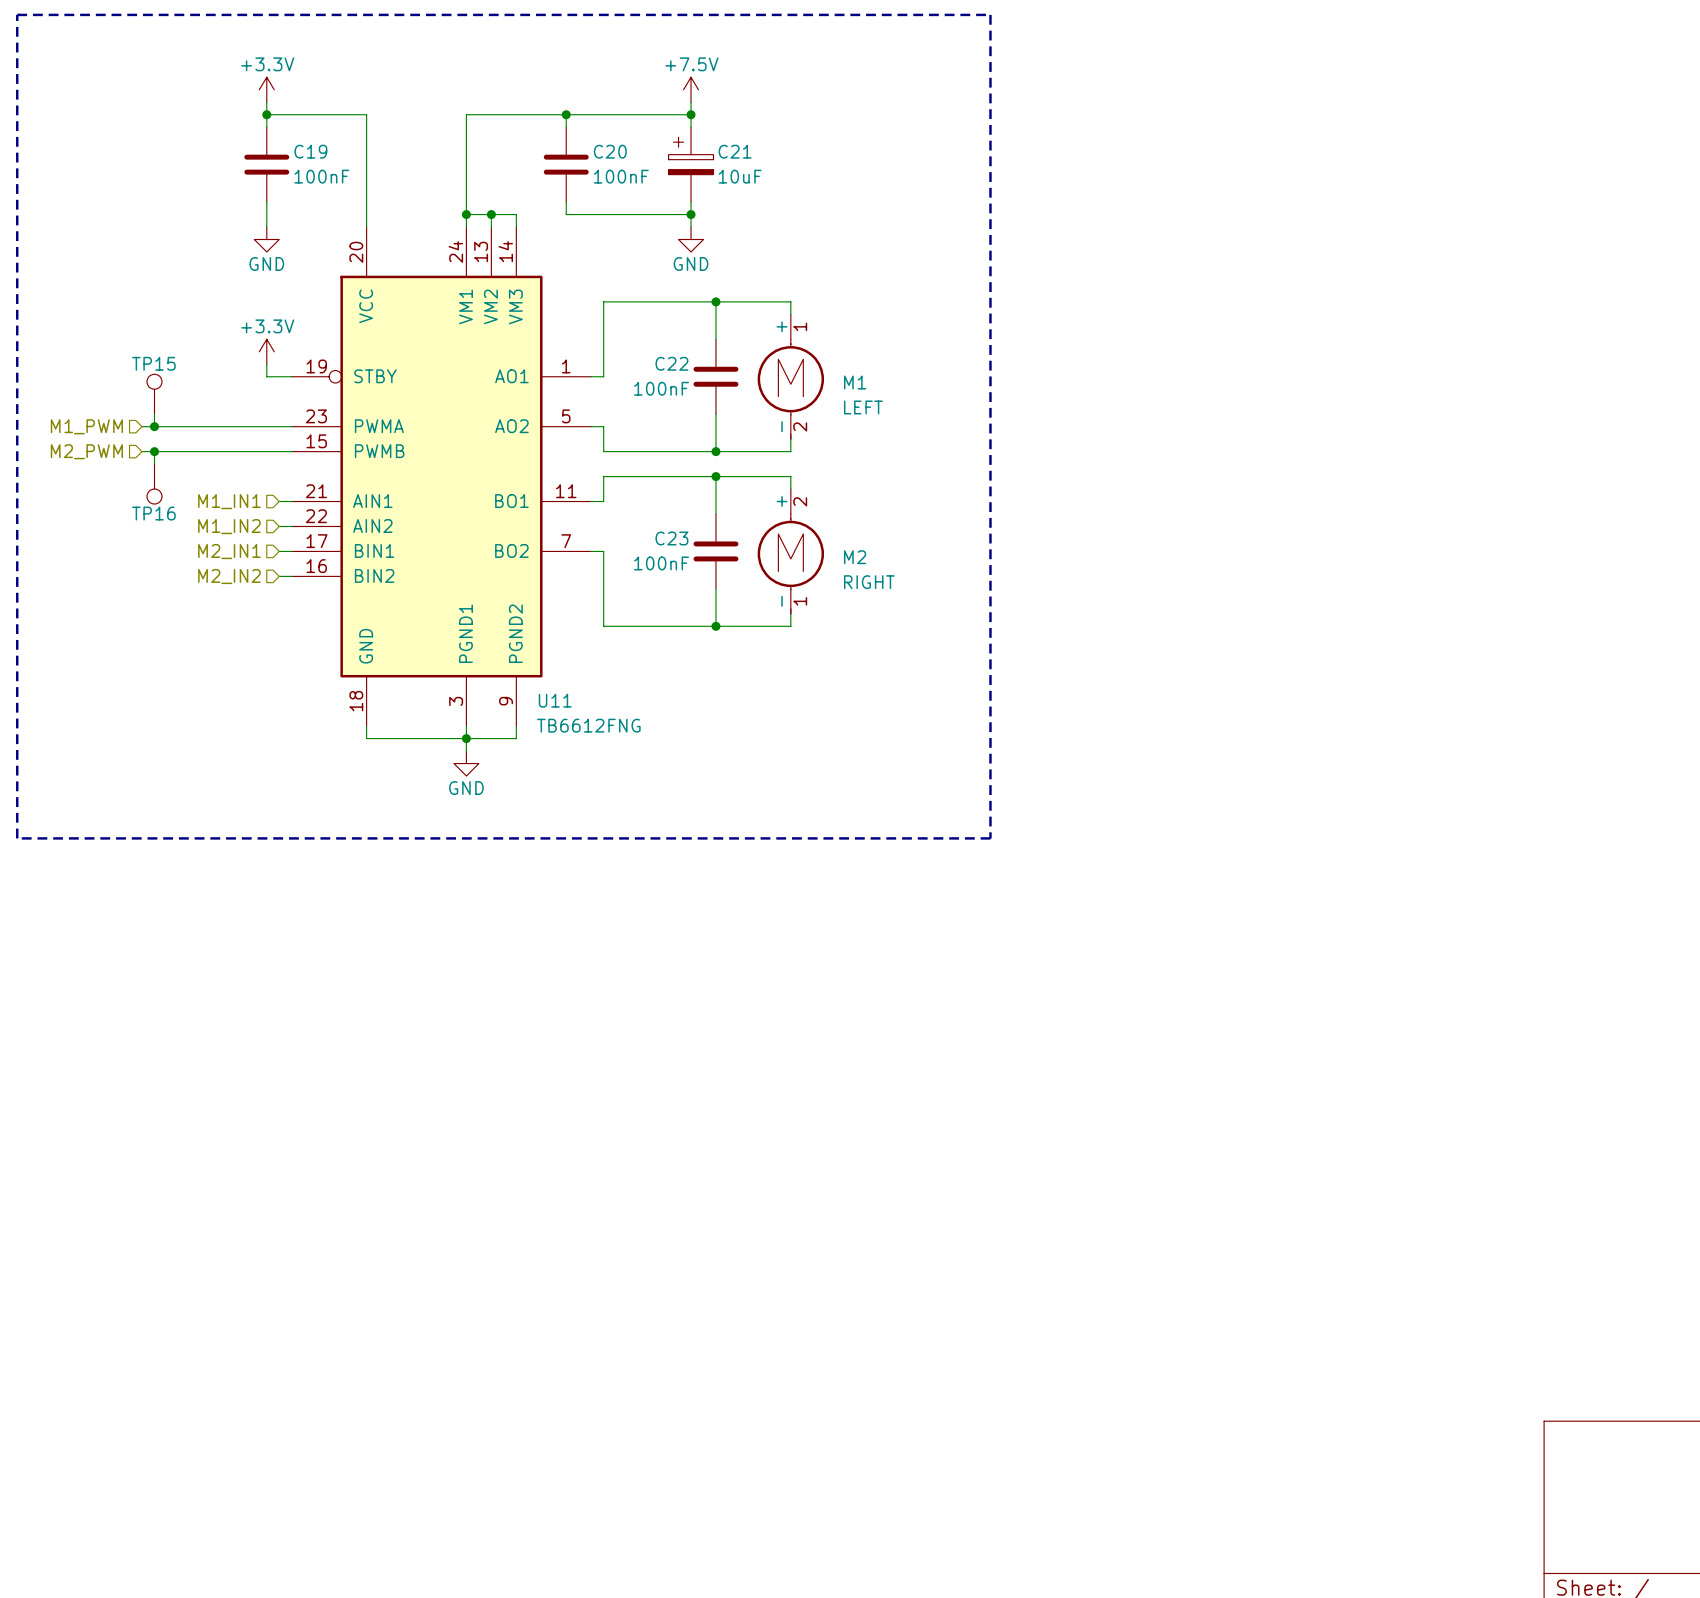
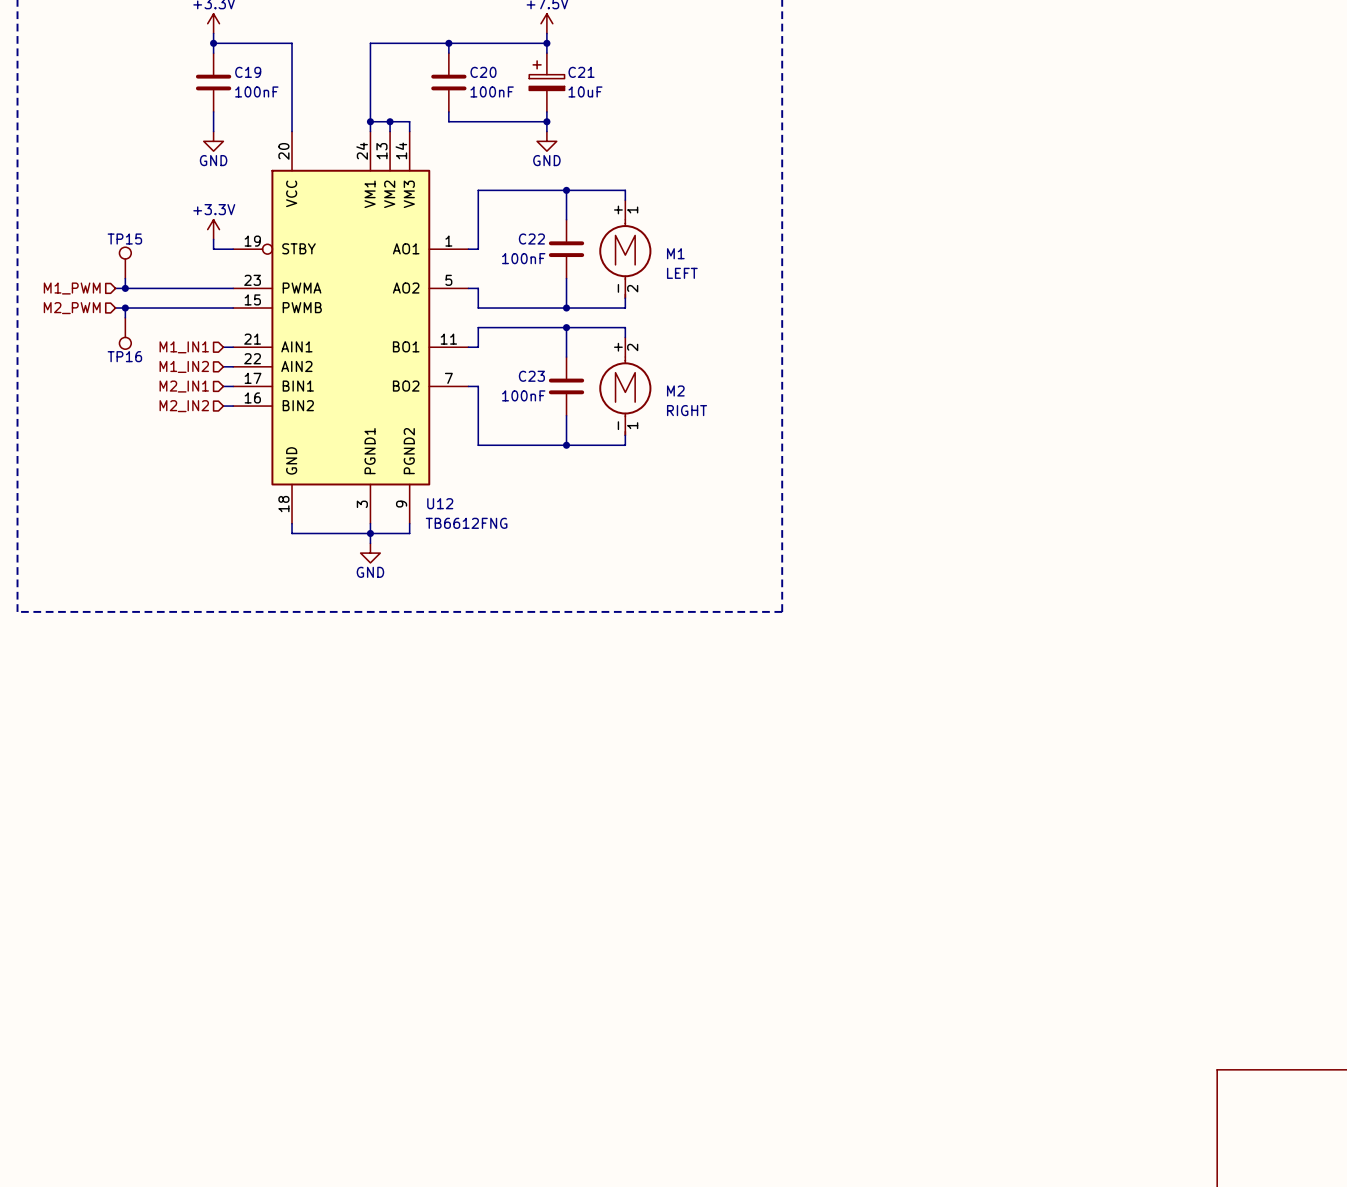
U11 name: U11 (555, 700) -> U12 (440, 503)

